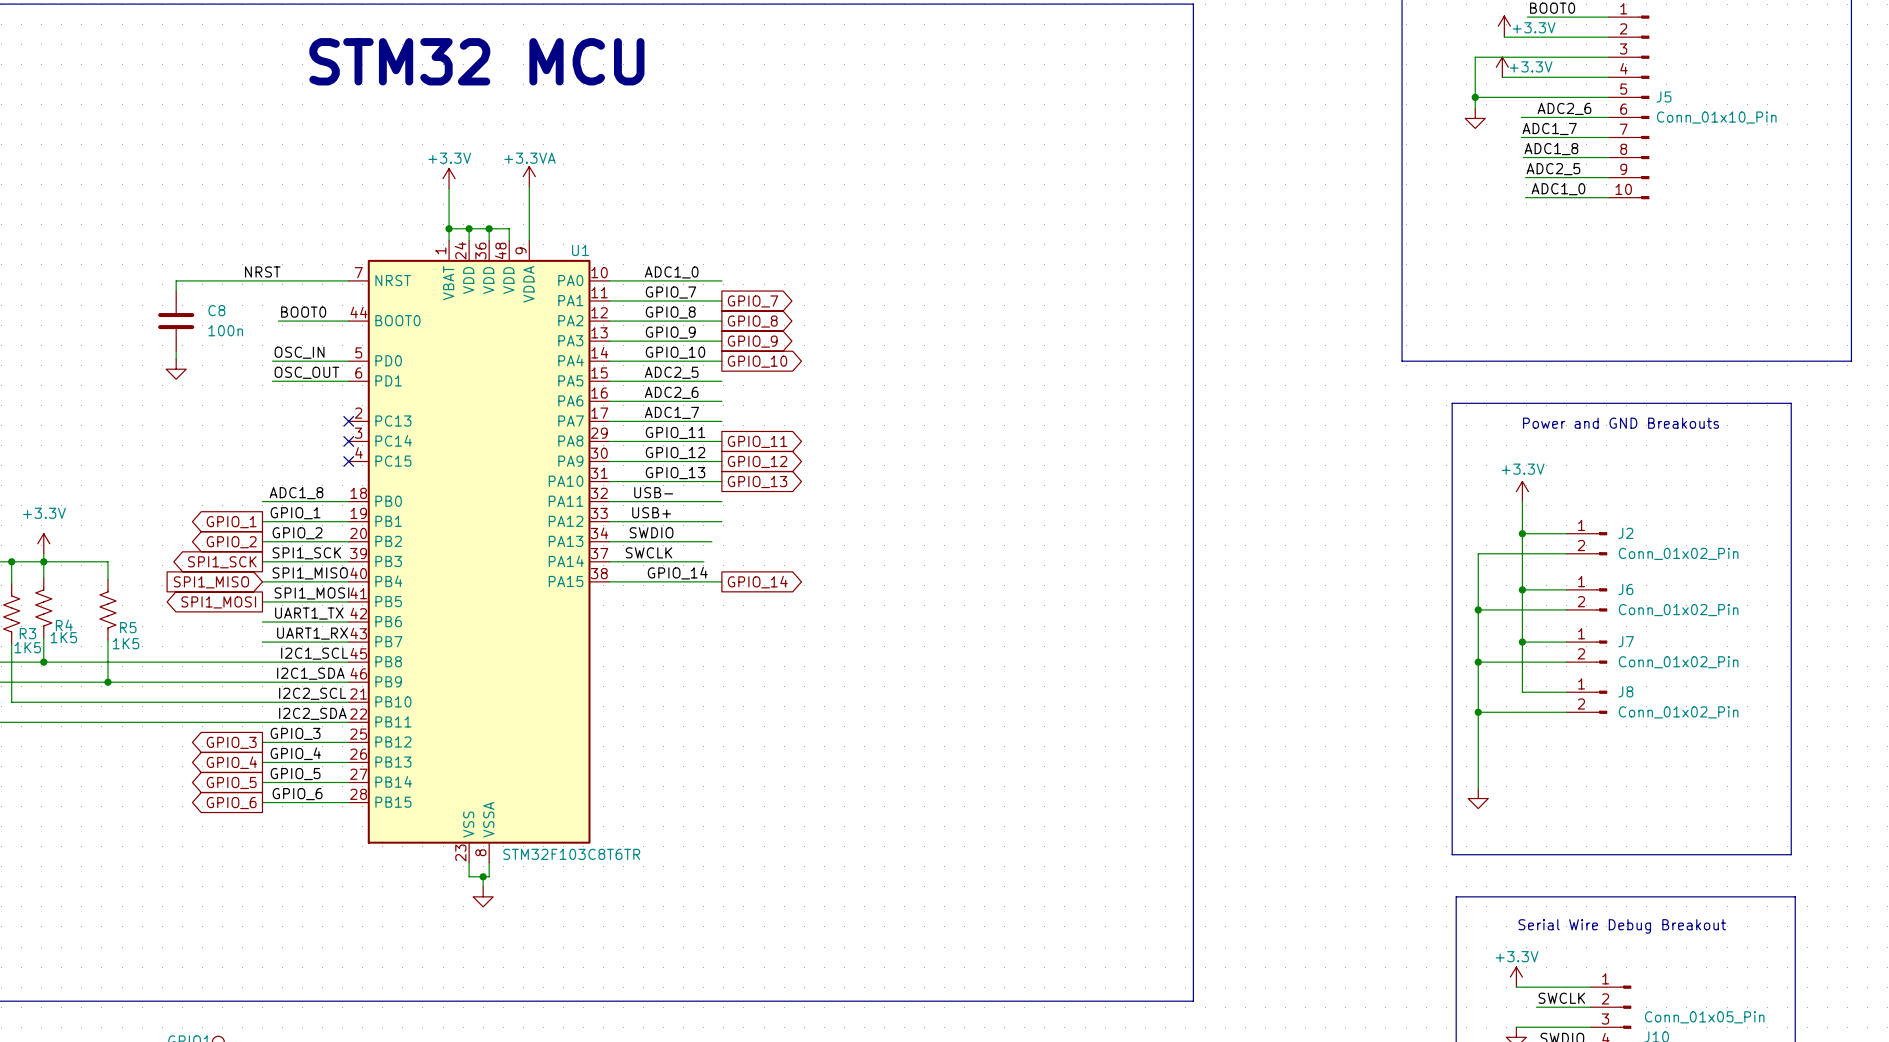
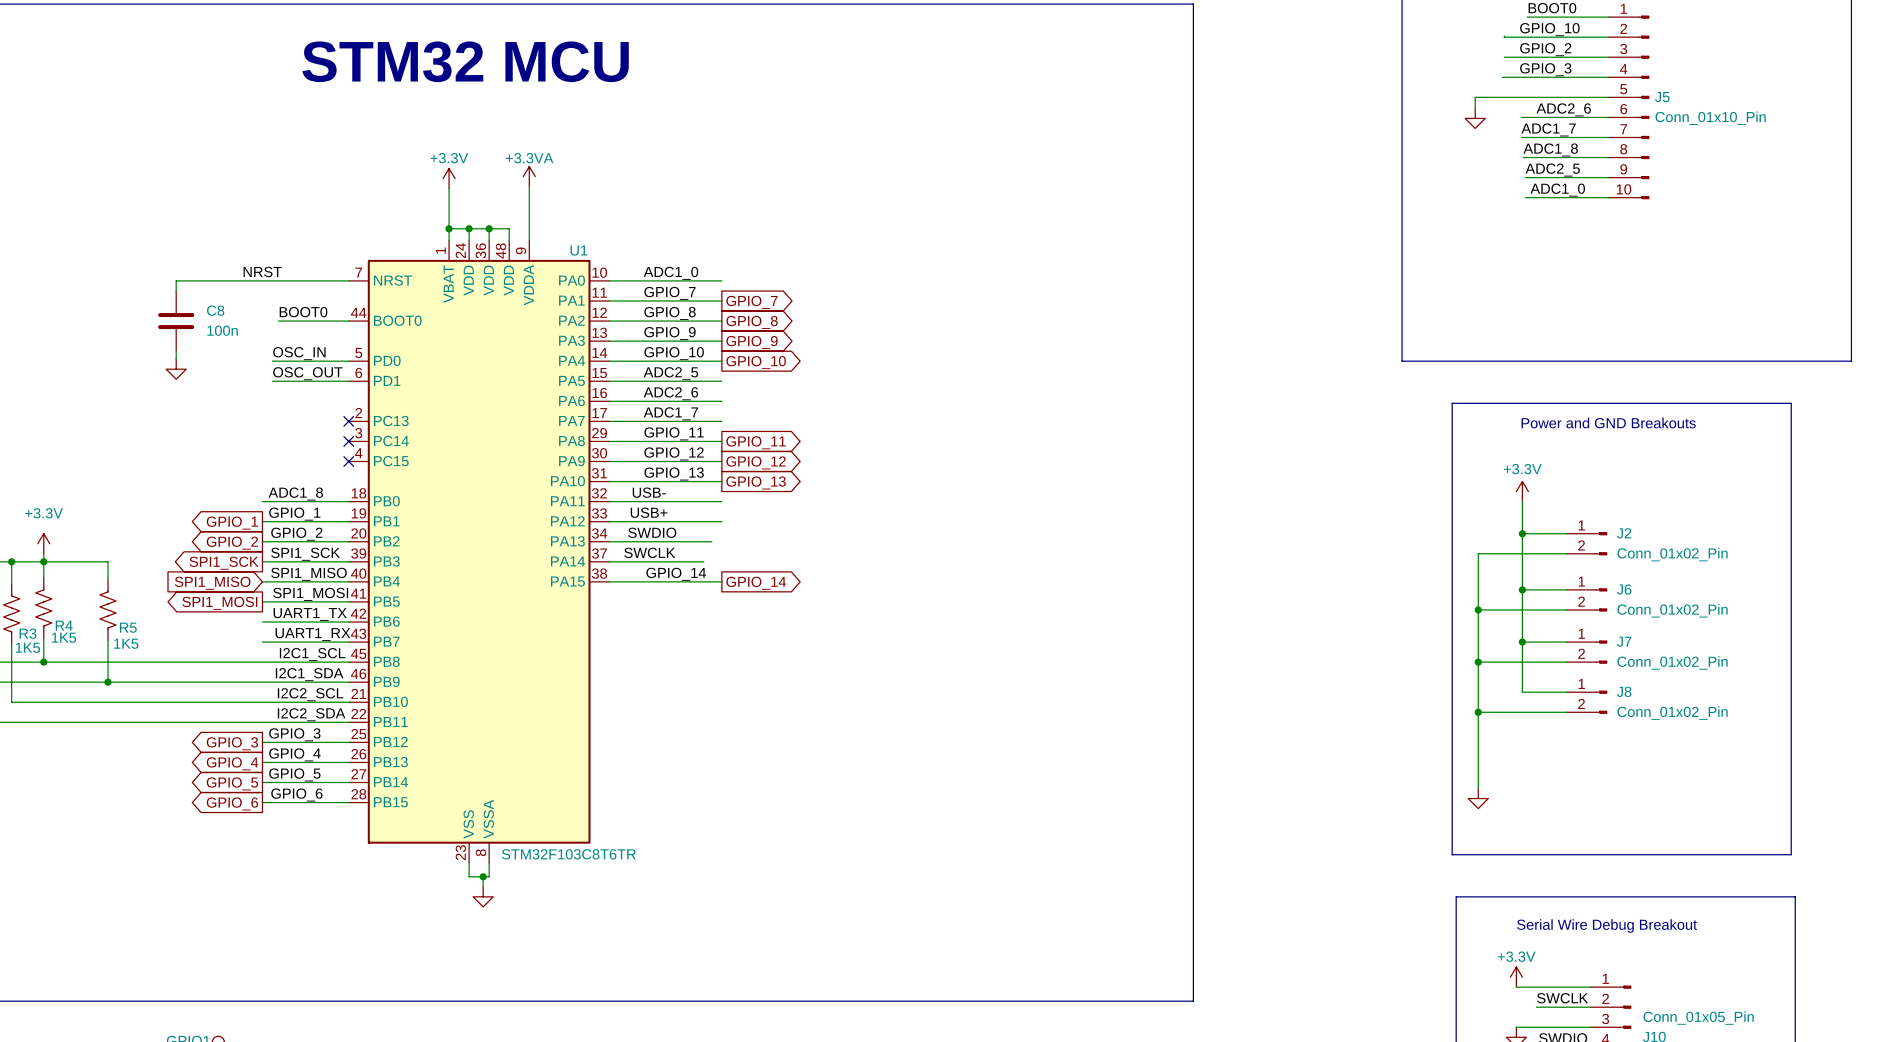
power symbol: +3.3V (1504, 26) -> none
label: none -> GPIO_10 (1549, 29)
label: none -> GPIO_2 (1545, 49)
wire: (1504, 57) (1475, 57) (1475, 97) -> none
power symbol: +3.3V (1502, 67) -> none
label: none -> GPIO_3 (1545, 69)
junction: (1475, 97) -> none

